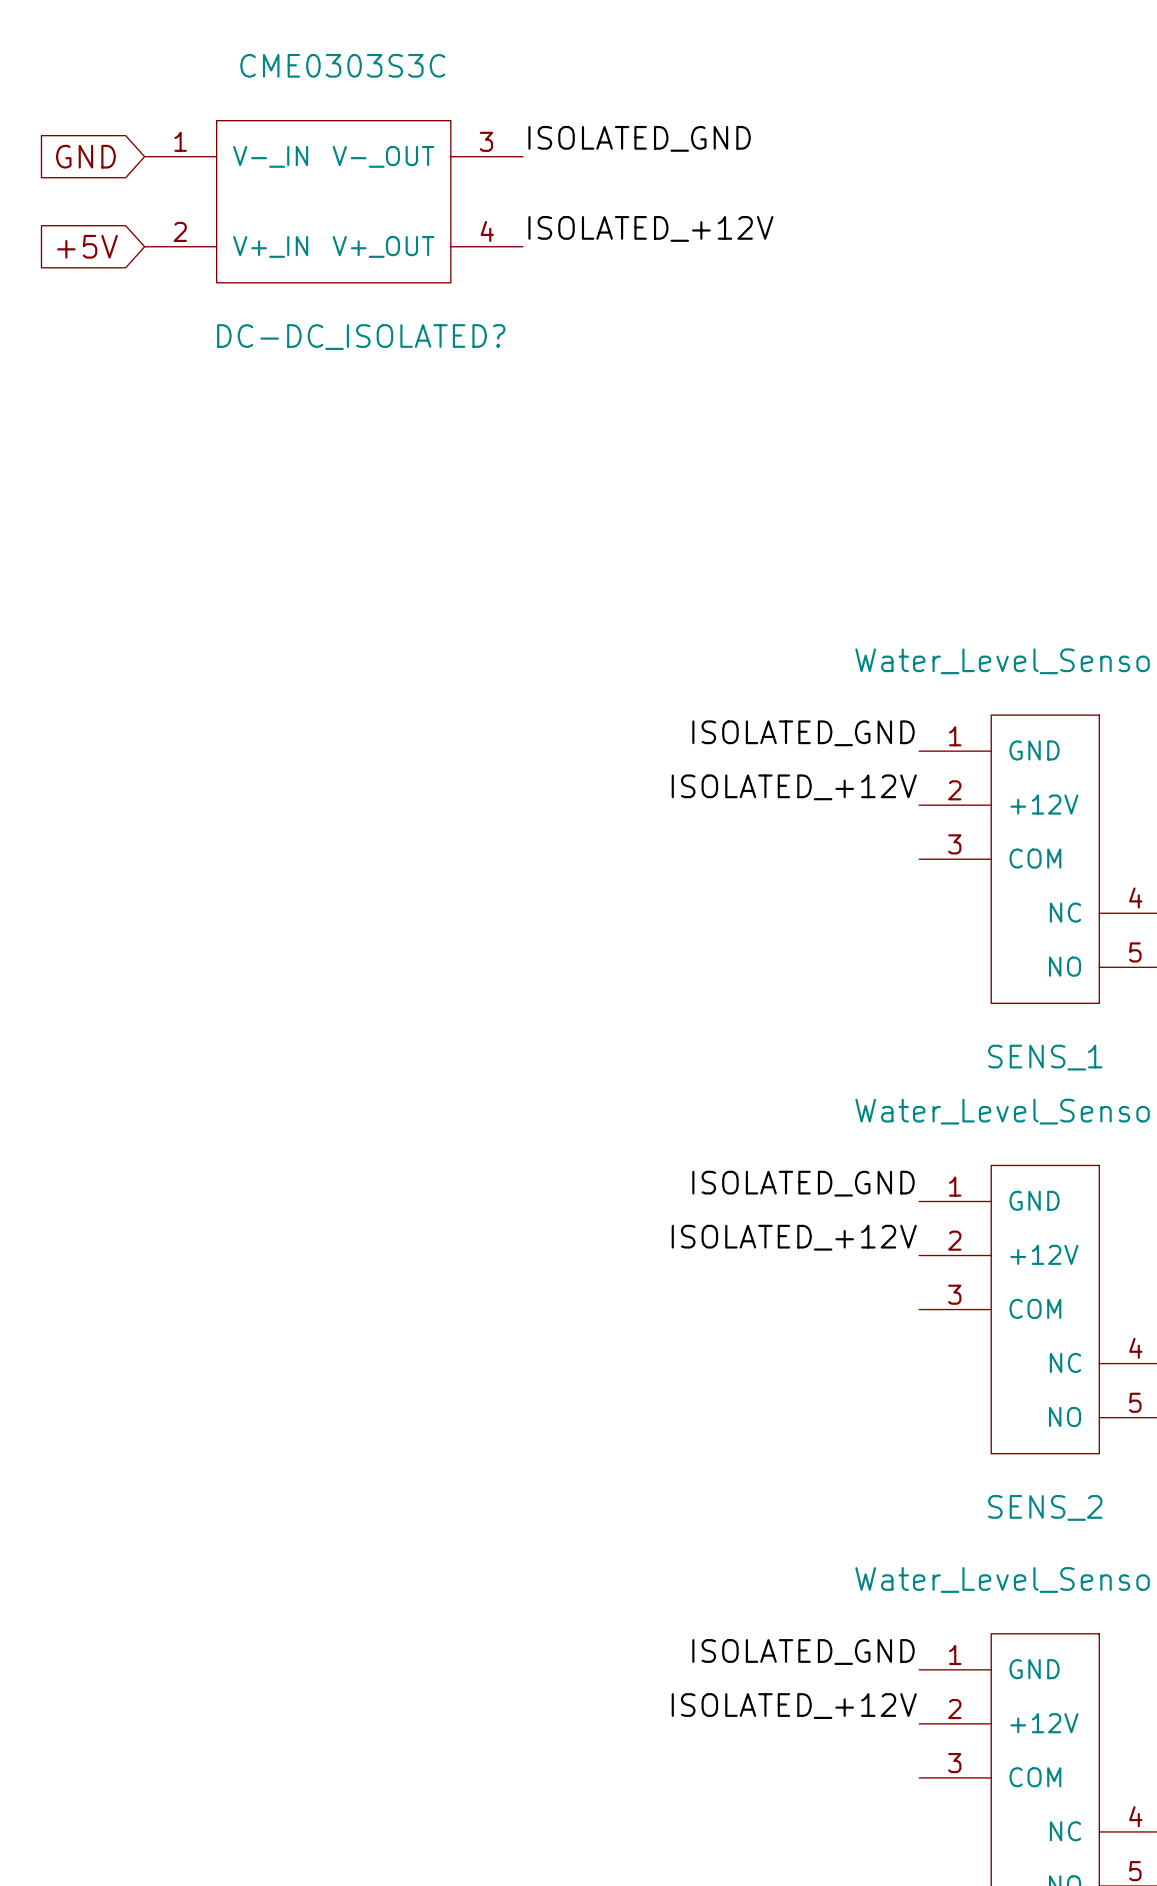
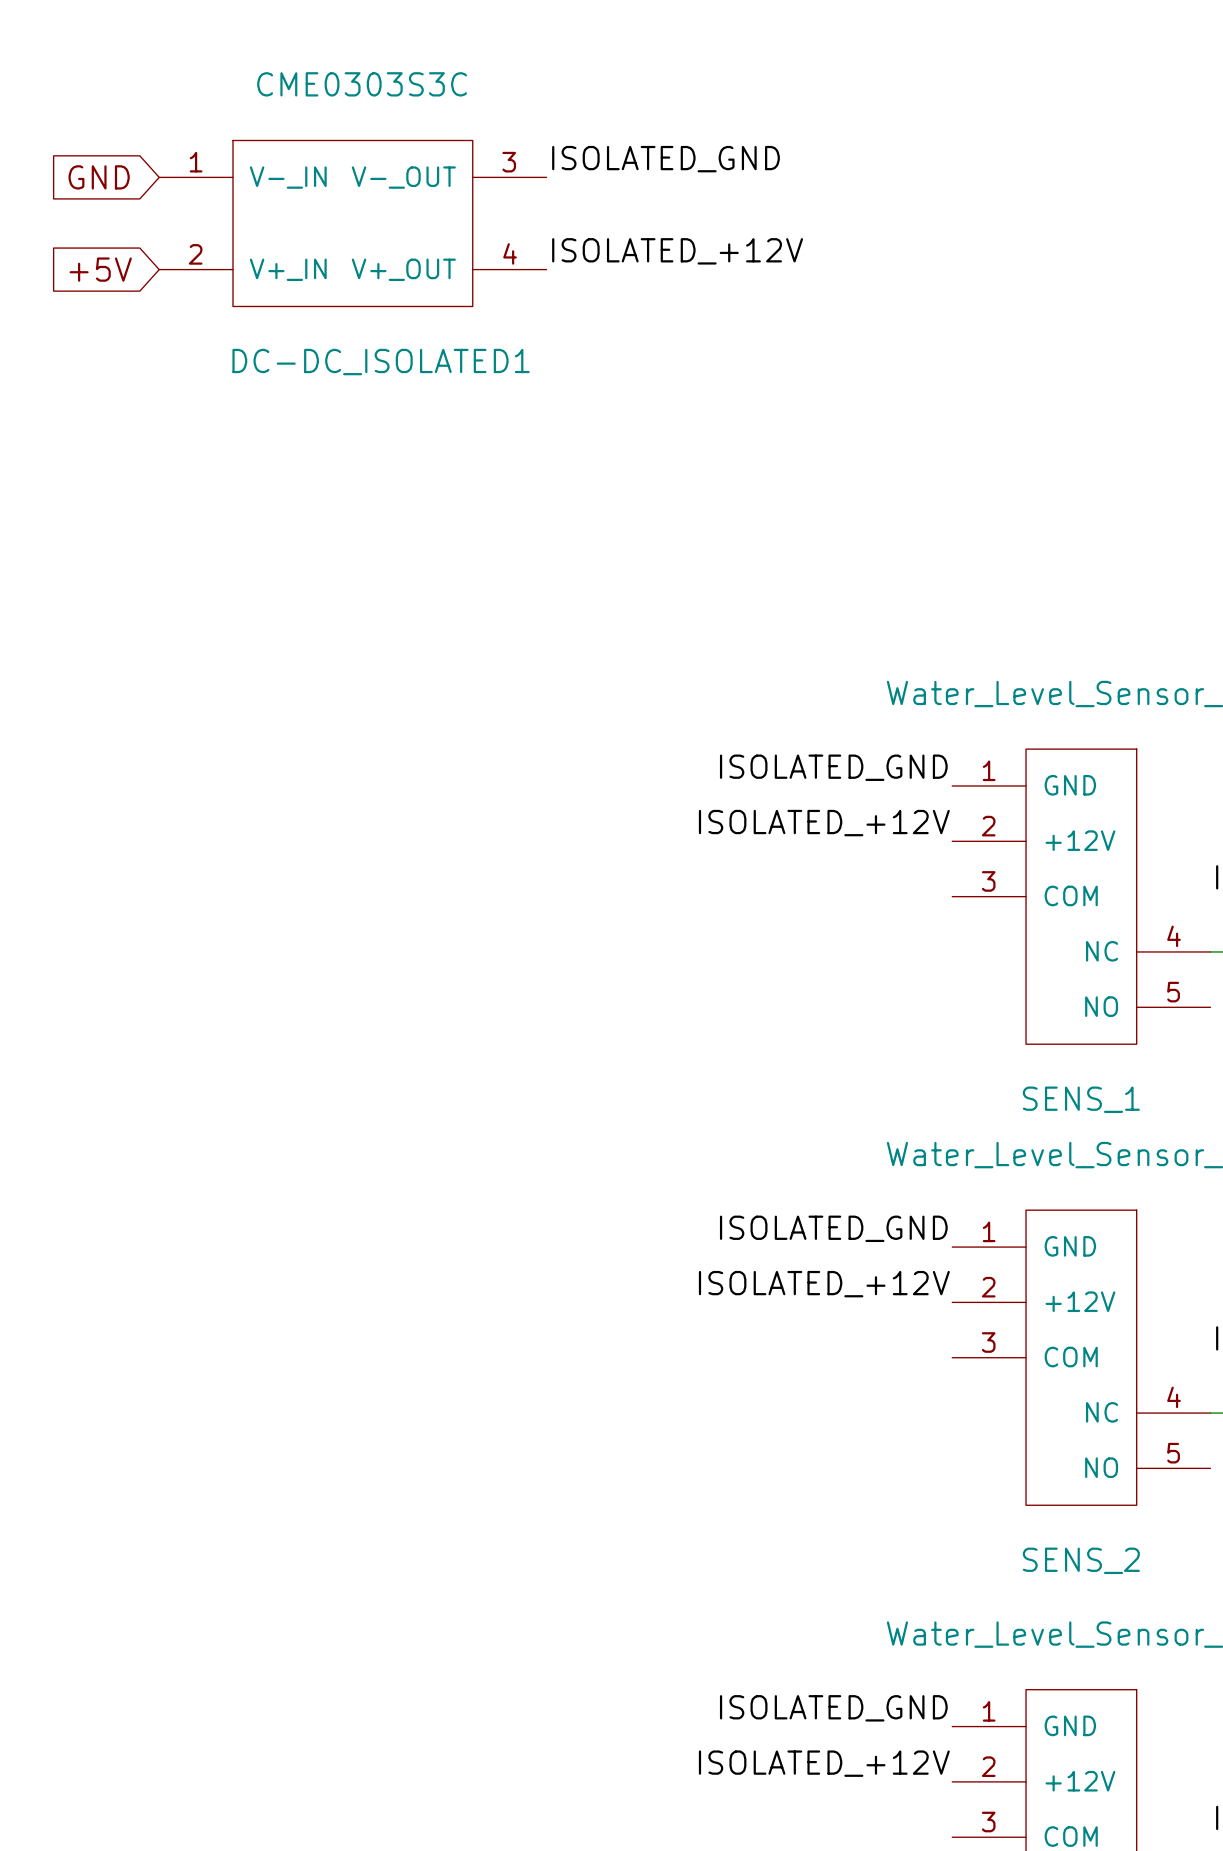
DC-DC_ISOLATED? name: DC-DC_ISOLATED? (361, 337) -> DC-DC_ISOLATED1 (381, 362)

